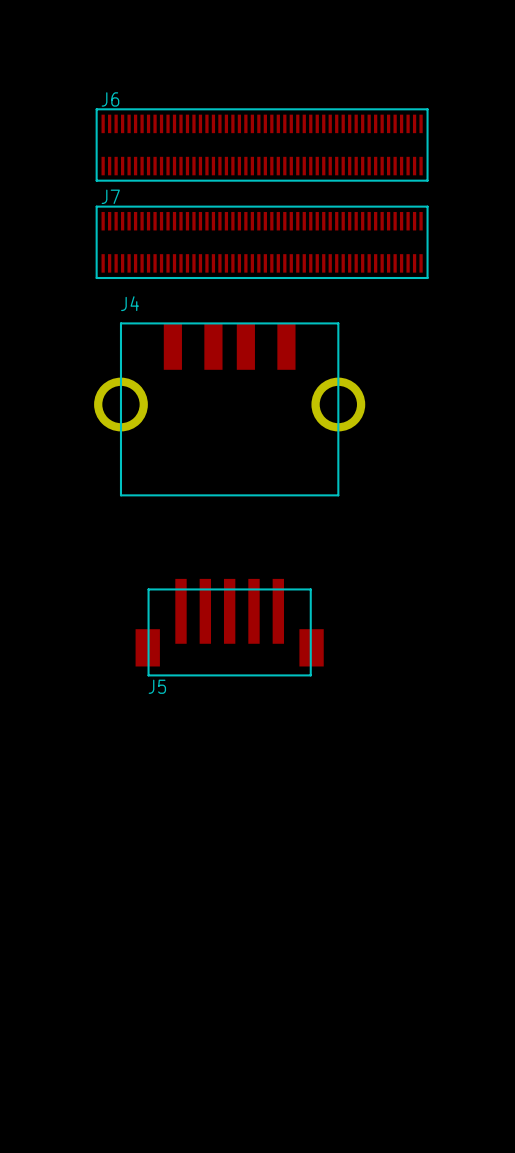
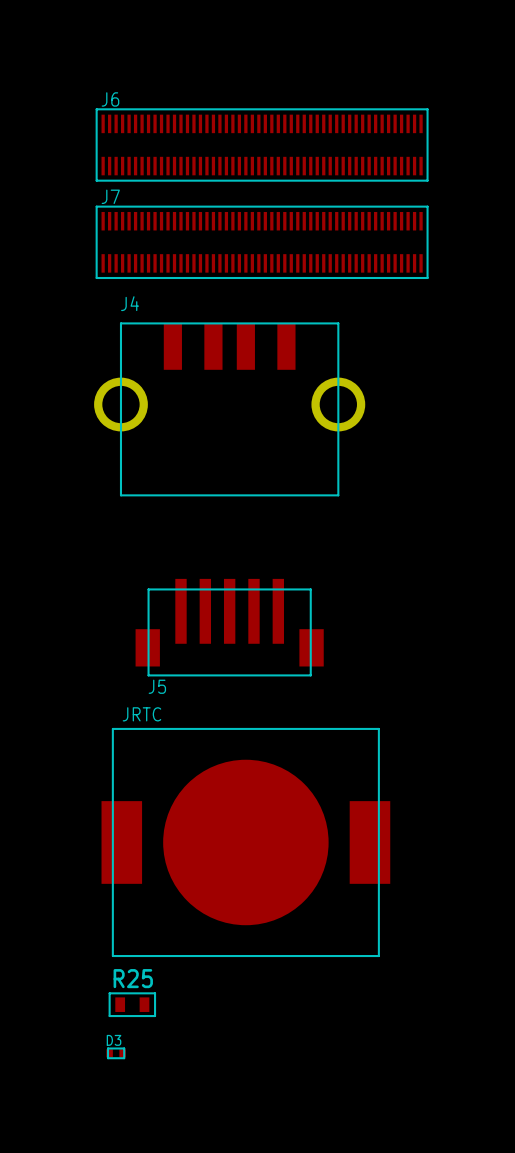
JRTC: none -> (245, 842)
R25: none -> (132, 1004)
D3: none -> (116, 1053)

